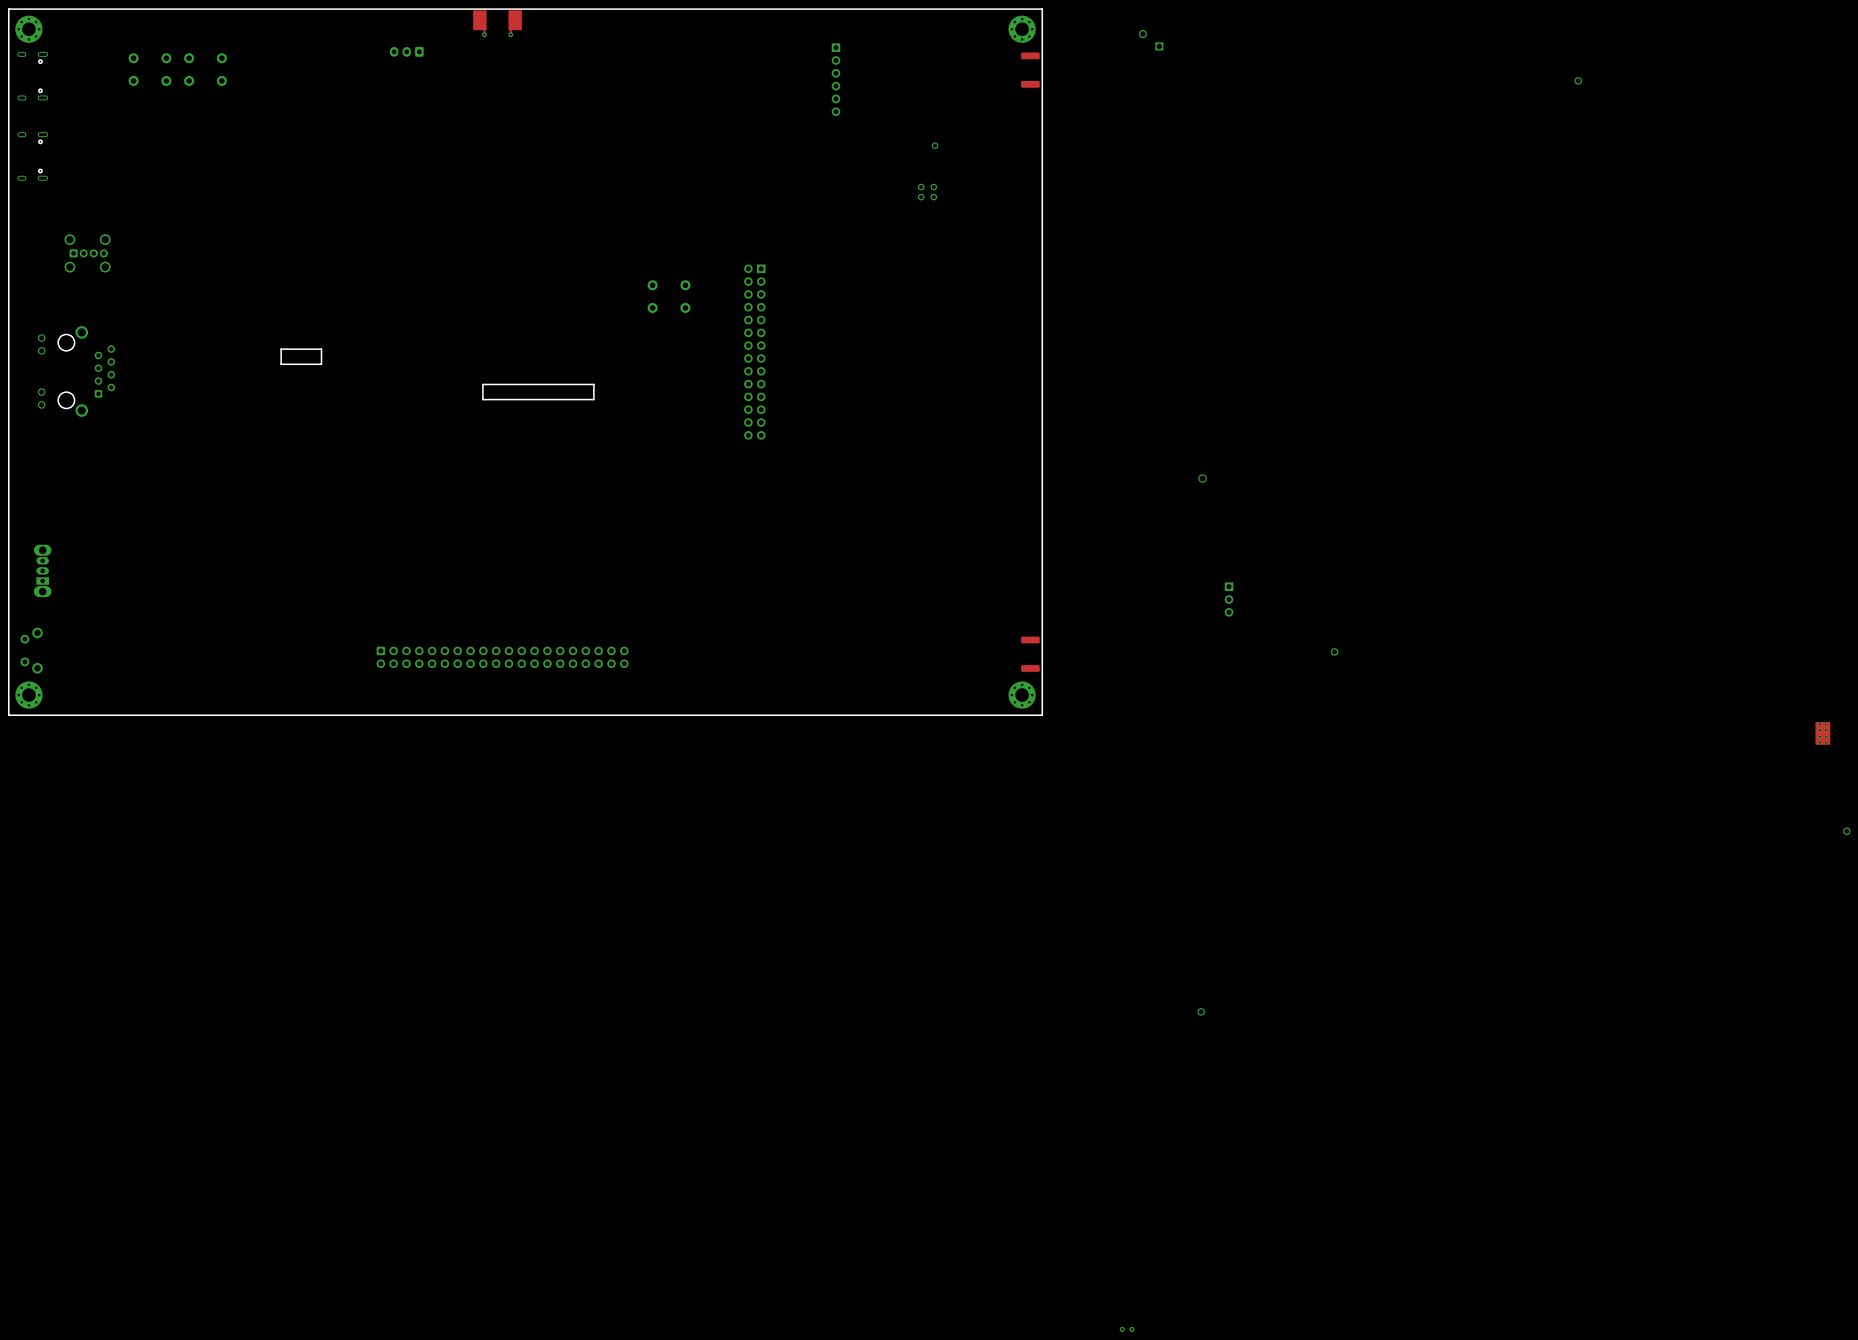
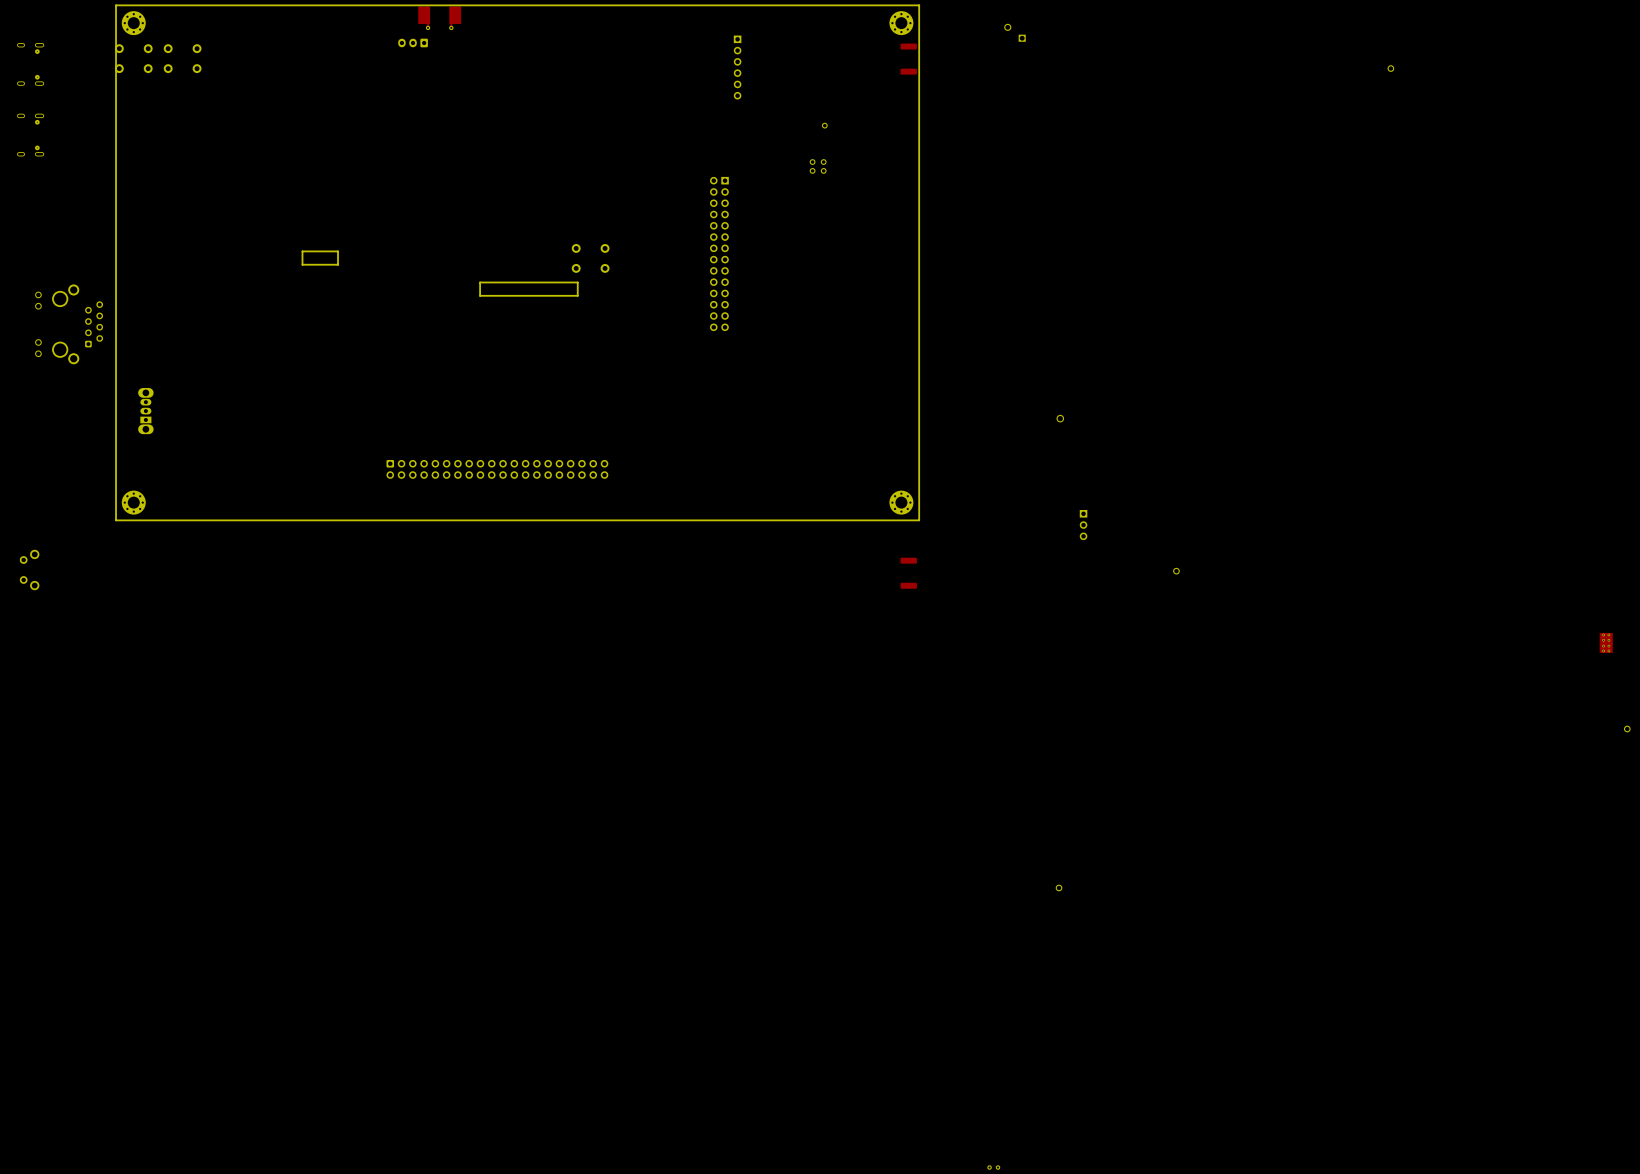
board edge: (129, 9) (8, 9) (8, 715) (1042, 715) (1042, 594) -> (116, 5) (116, 520) (919, 520)
part position: (28, 29) -> (133, 23)
part position: (406, 51) -> (413, 42)
part: (87, 253) -> none
board edge: (281, 349) (321, 349) (321, 364) (281, 364) (281, 349) -> (302, 251) (338, 251) (338, 264) (302, 264) (302, 251)
part position: (754, 352) -> (719, 253)
board edge: (482, 384) (593, 384) (593, 399) (482, 399) (482, 384) -> (480, 282) (577, 282) (577, 295) (480, 295) (480, 282)
part: none -> (145, 411)
part: none -> (497, 469)
part: (42, 570) -> none
part: none -> (133, 502)
part: (502, 657) -> none
part: (28, 695) -> none
part position: (1022, 695) -> (901, 502)

